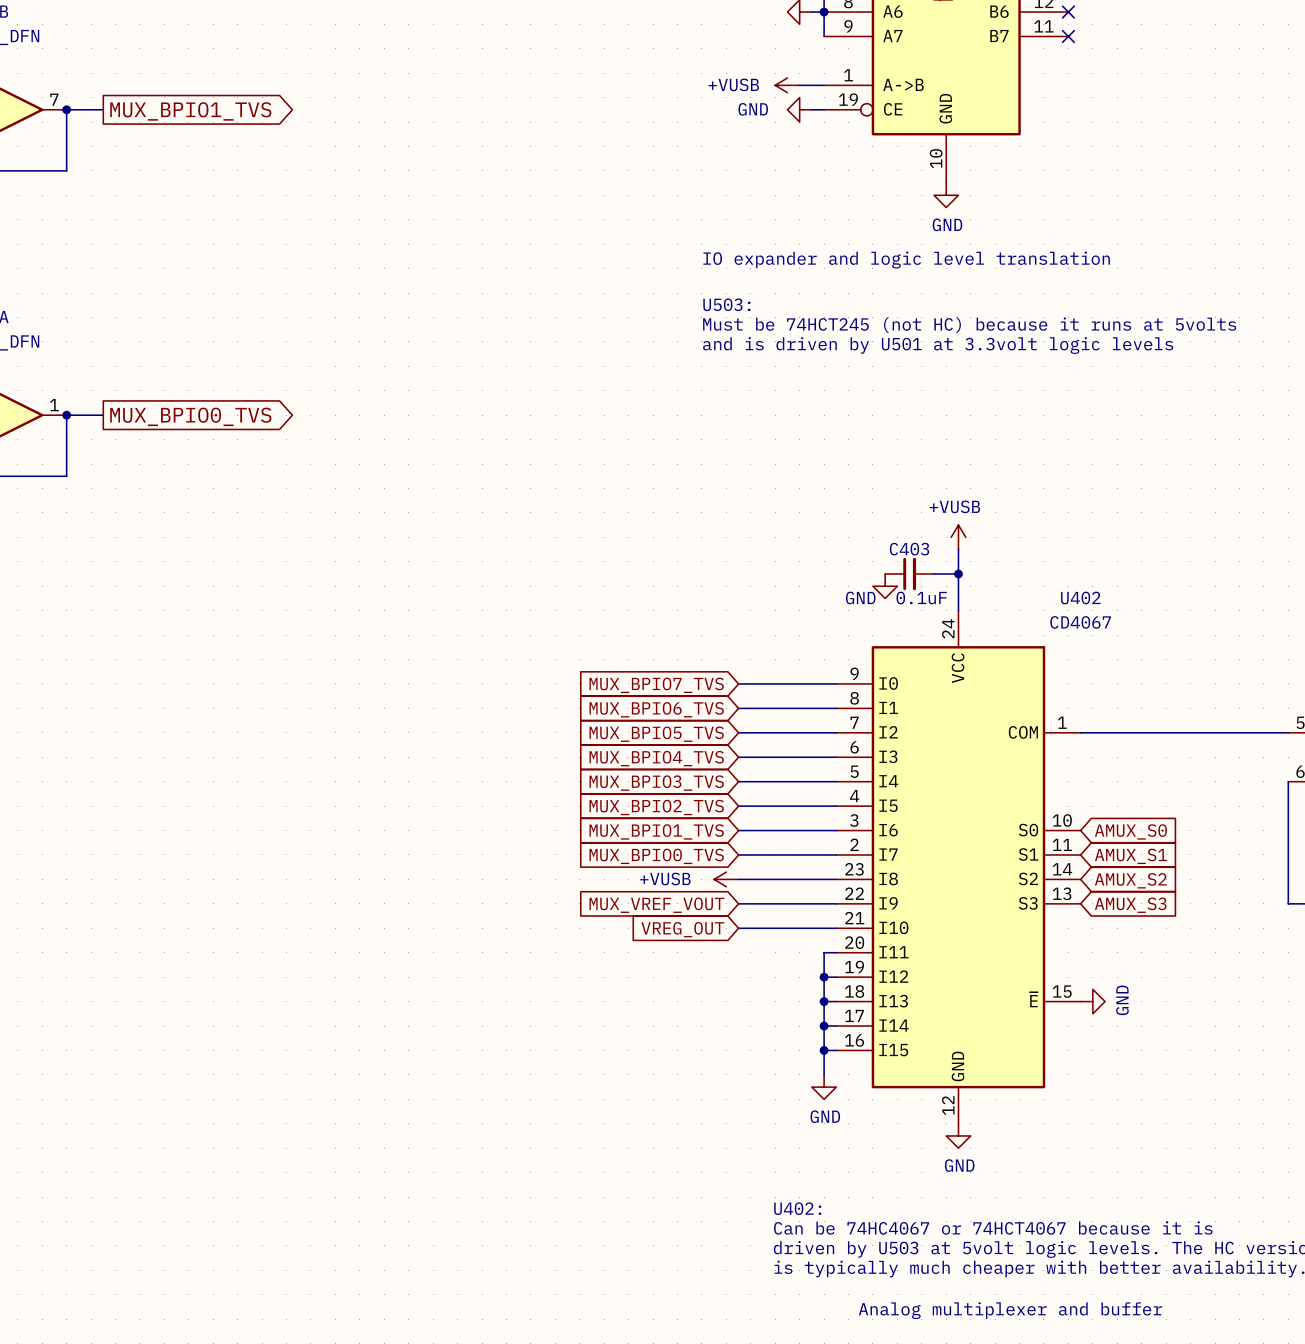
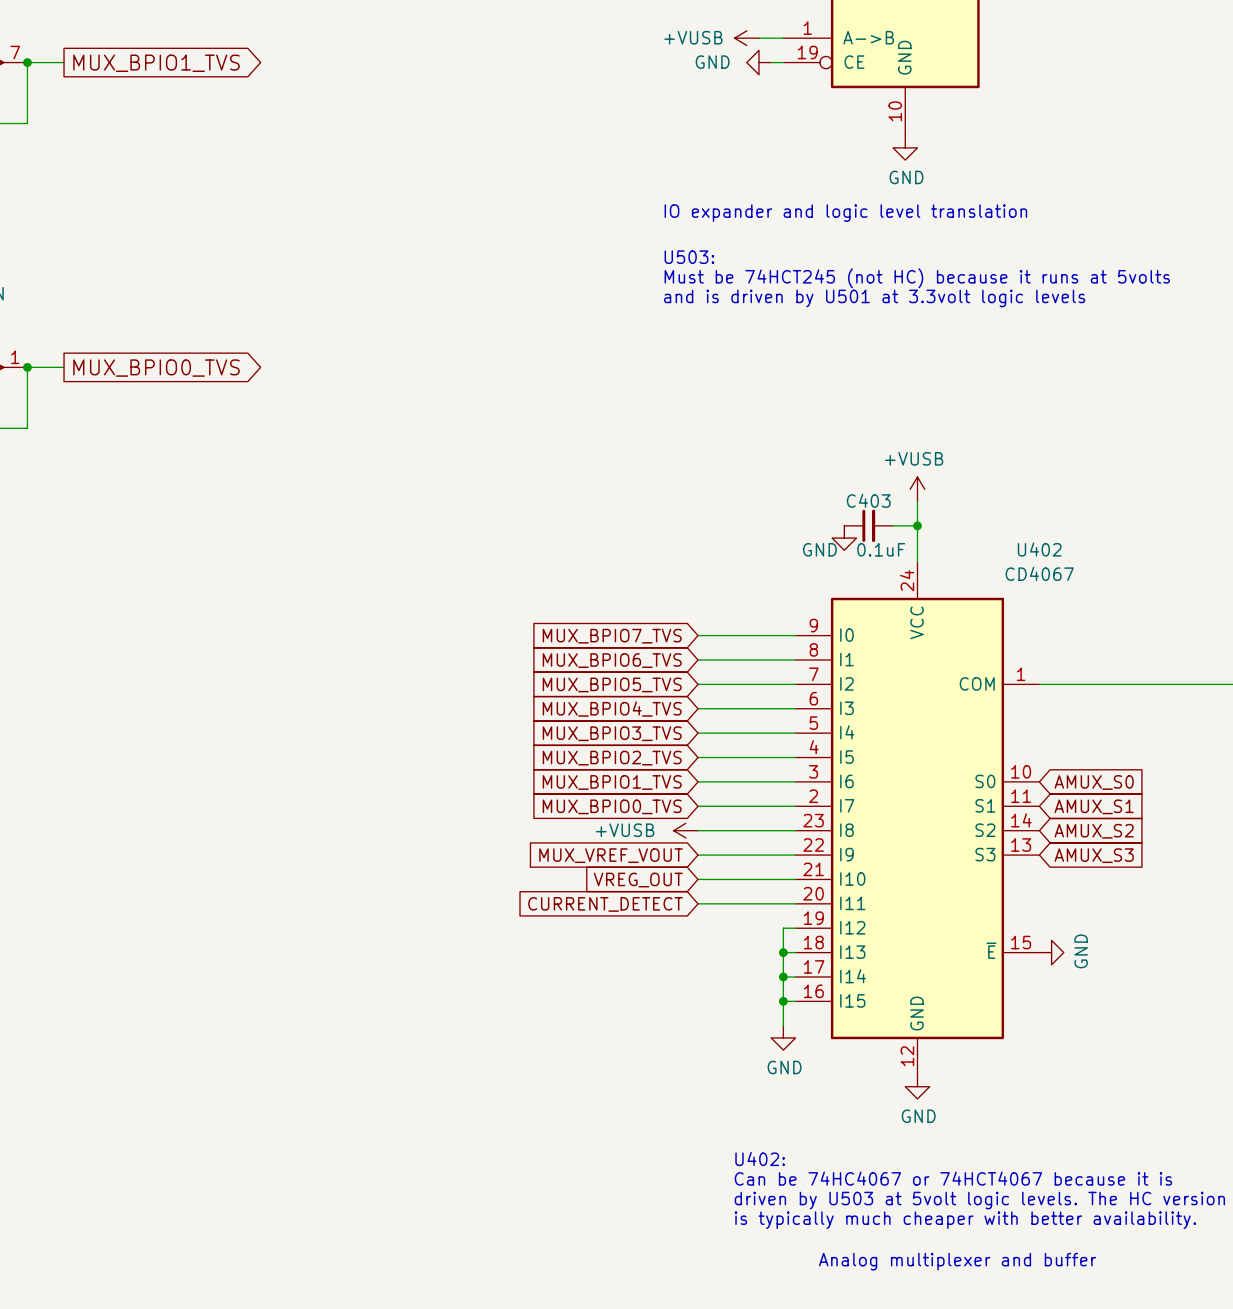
wire: (824, 952) (824, 977) -> (783, 903) (698, 903)
global label: none -> CURRENT_DETECT (605, 904)
junction: (824, 977) -> none

